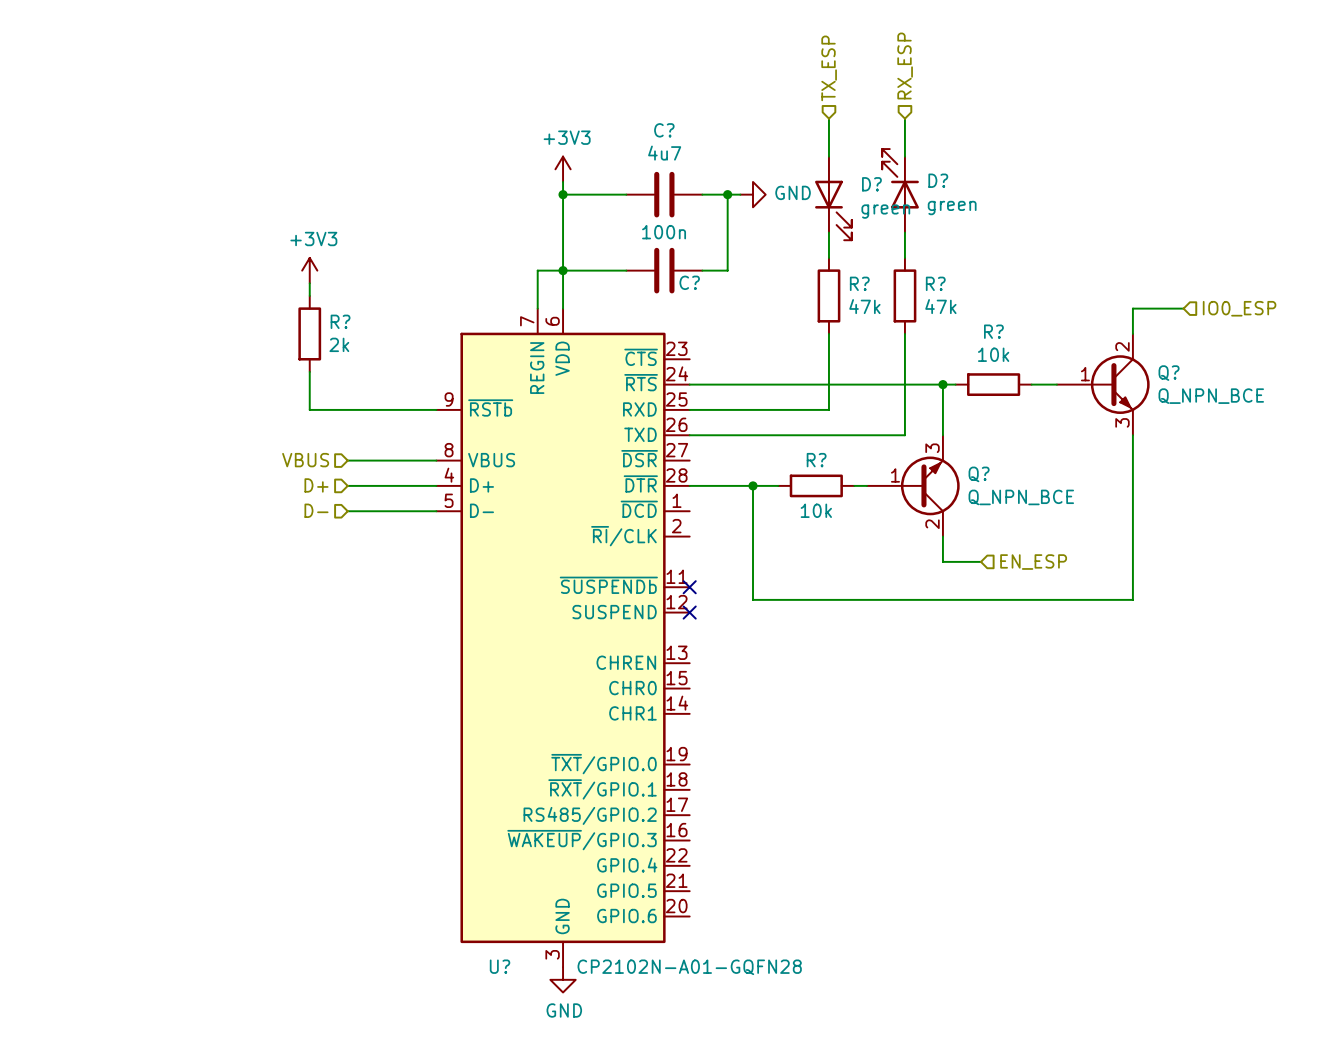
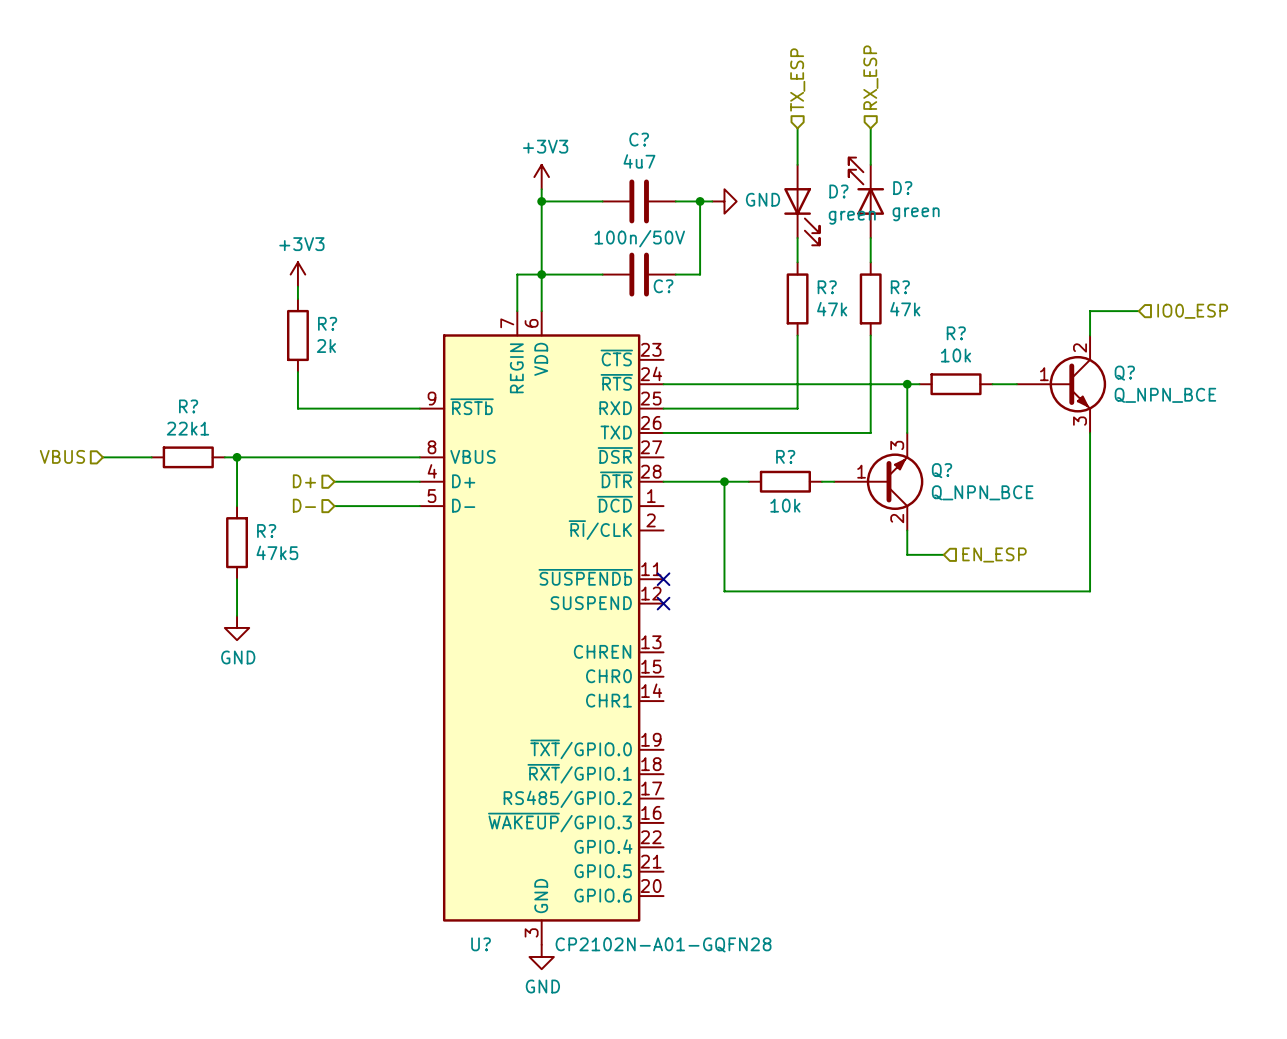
C? value: 100n (664, 232) -> 100n/50V (639, 238)
wire: none -> (102, 457) (151, 457)
R?: none -> 22k1 (188, 457)
wire: none -> (224, 457) (334, 457)
wire: none -> (237, 457) (237, 506)
junction: none -> (237, 457)
hierarchical label position: VBUS (305, 460) -> VBUS (62, 456)
R?: none -> 47k5 (237, 542)
wire: none -> (237, 579) (237, 615)
power symbol: none -> GND (237, 627)

